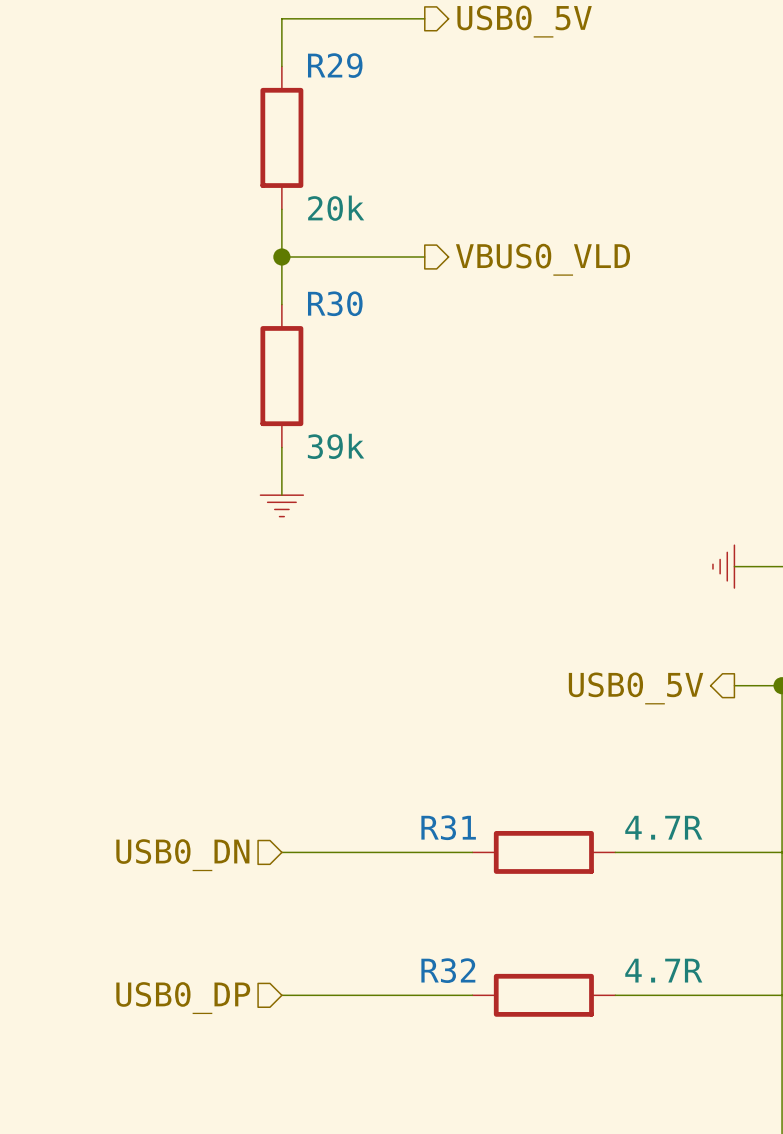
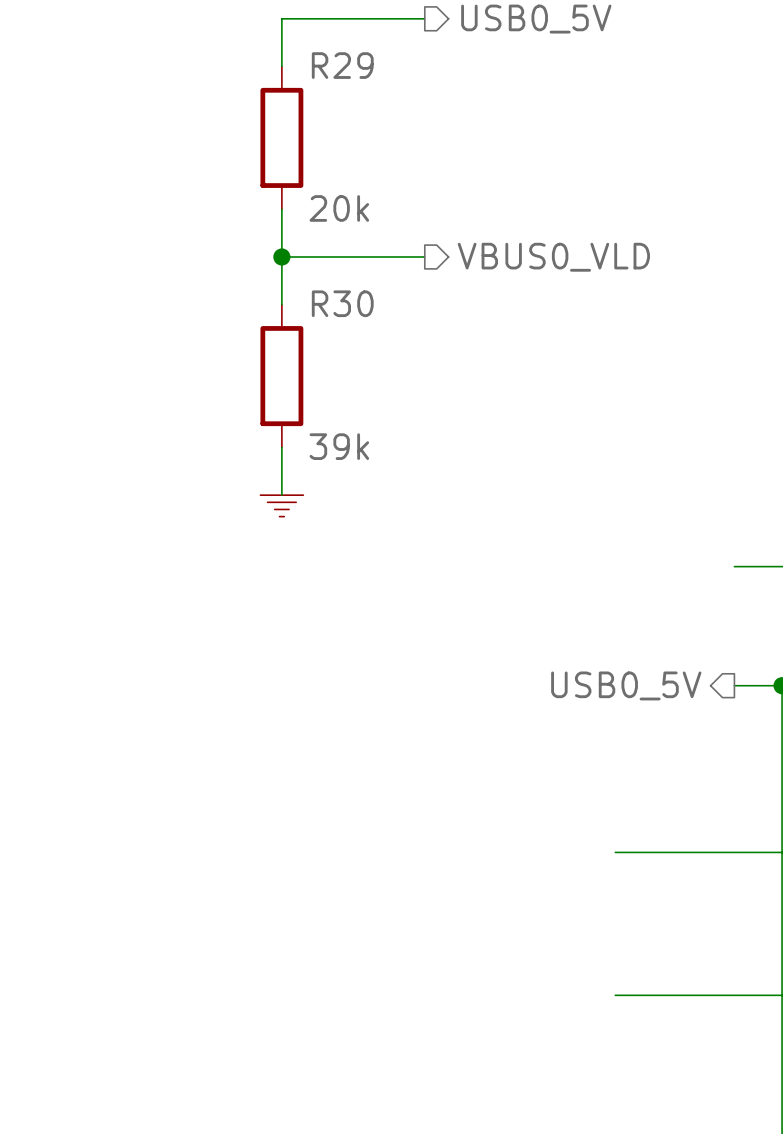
power symbol: (723, 566) -> none
wire: (281, 852) (472, 852) -> none
R31: 4.7R (543, 852) -> none
hierarchical label: USB0_DN (182, 855) -> none
wire: (281, 995) (472, 995) -> none
R32: 4.7R (543, 995) -> none
hierarchical label: USB0_DP (183, 998) -> none

